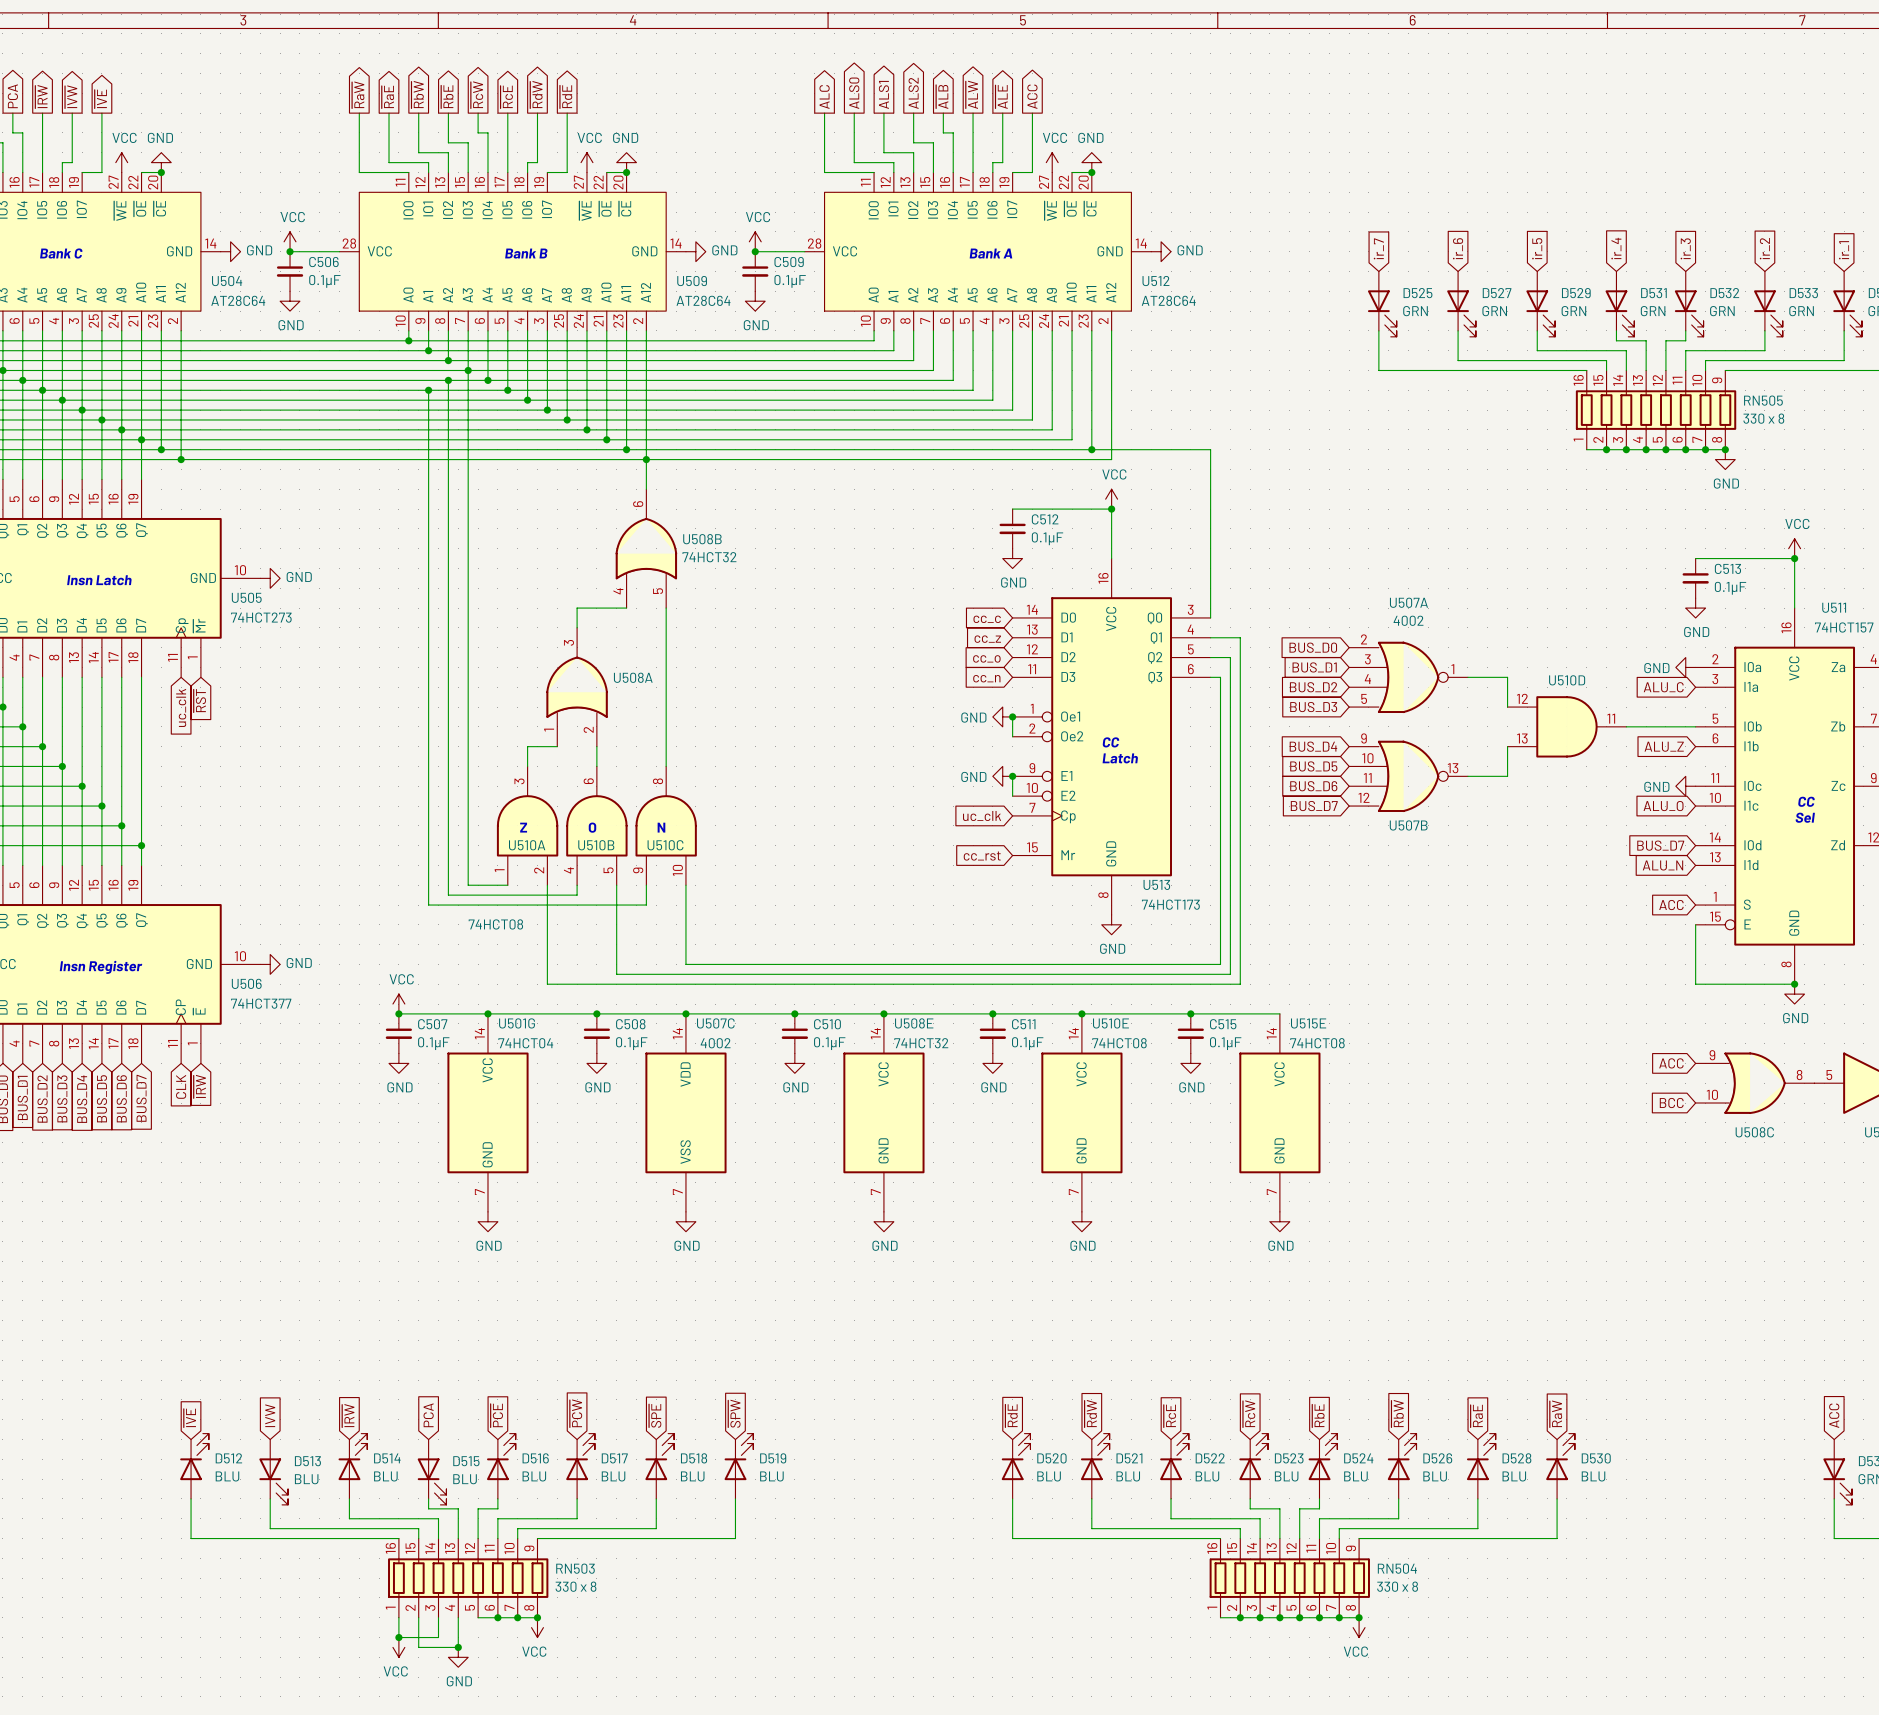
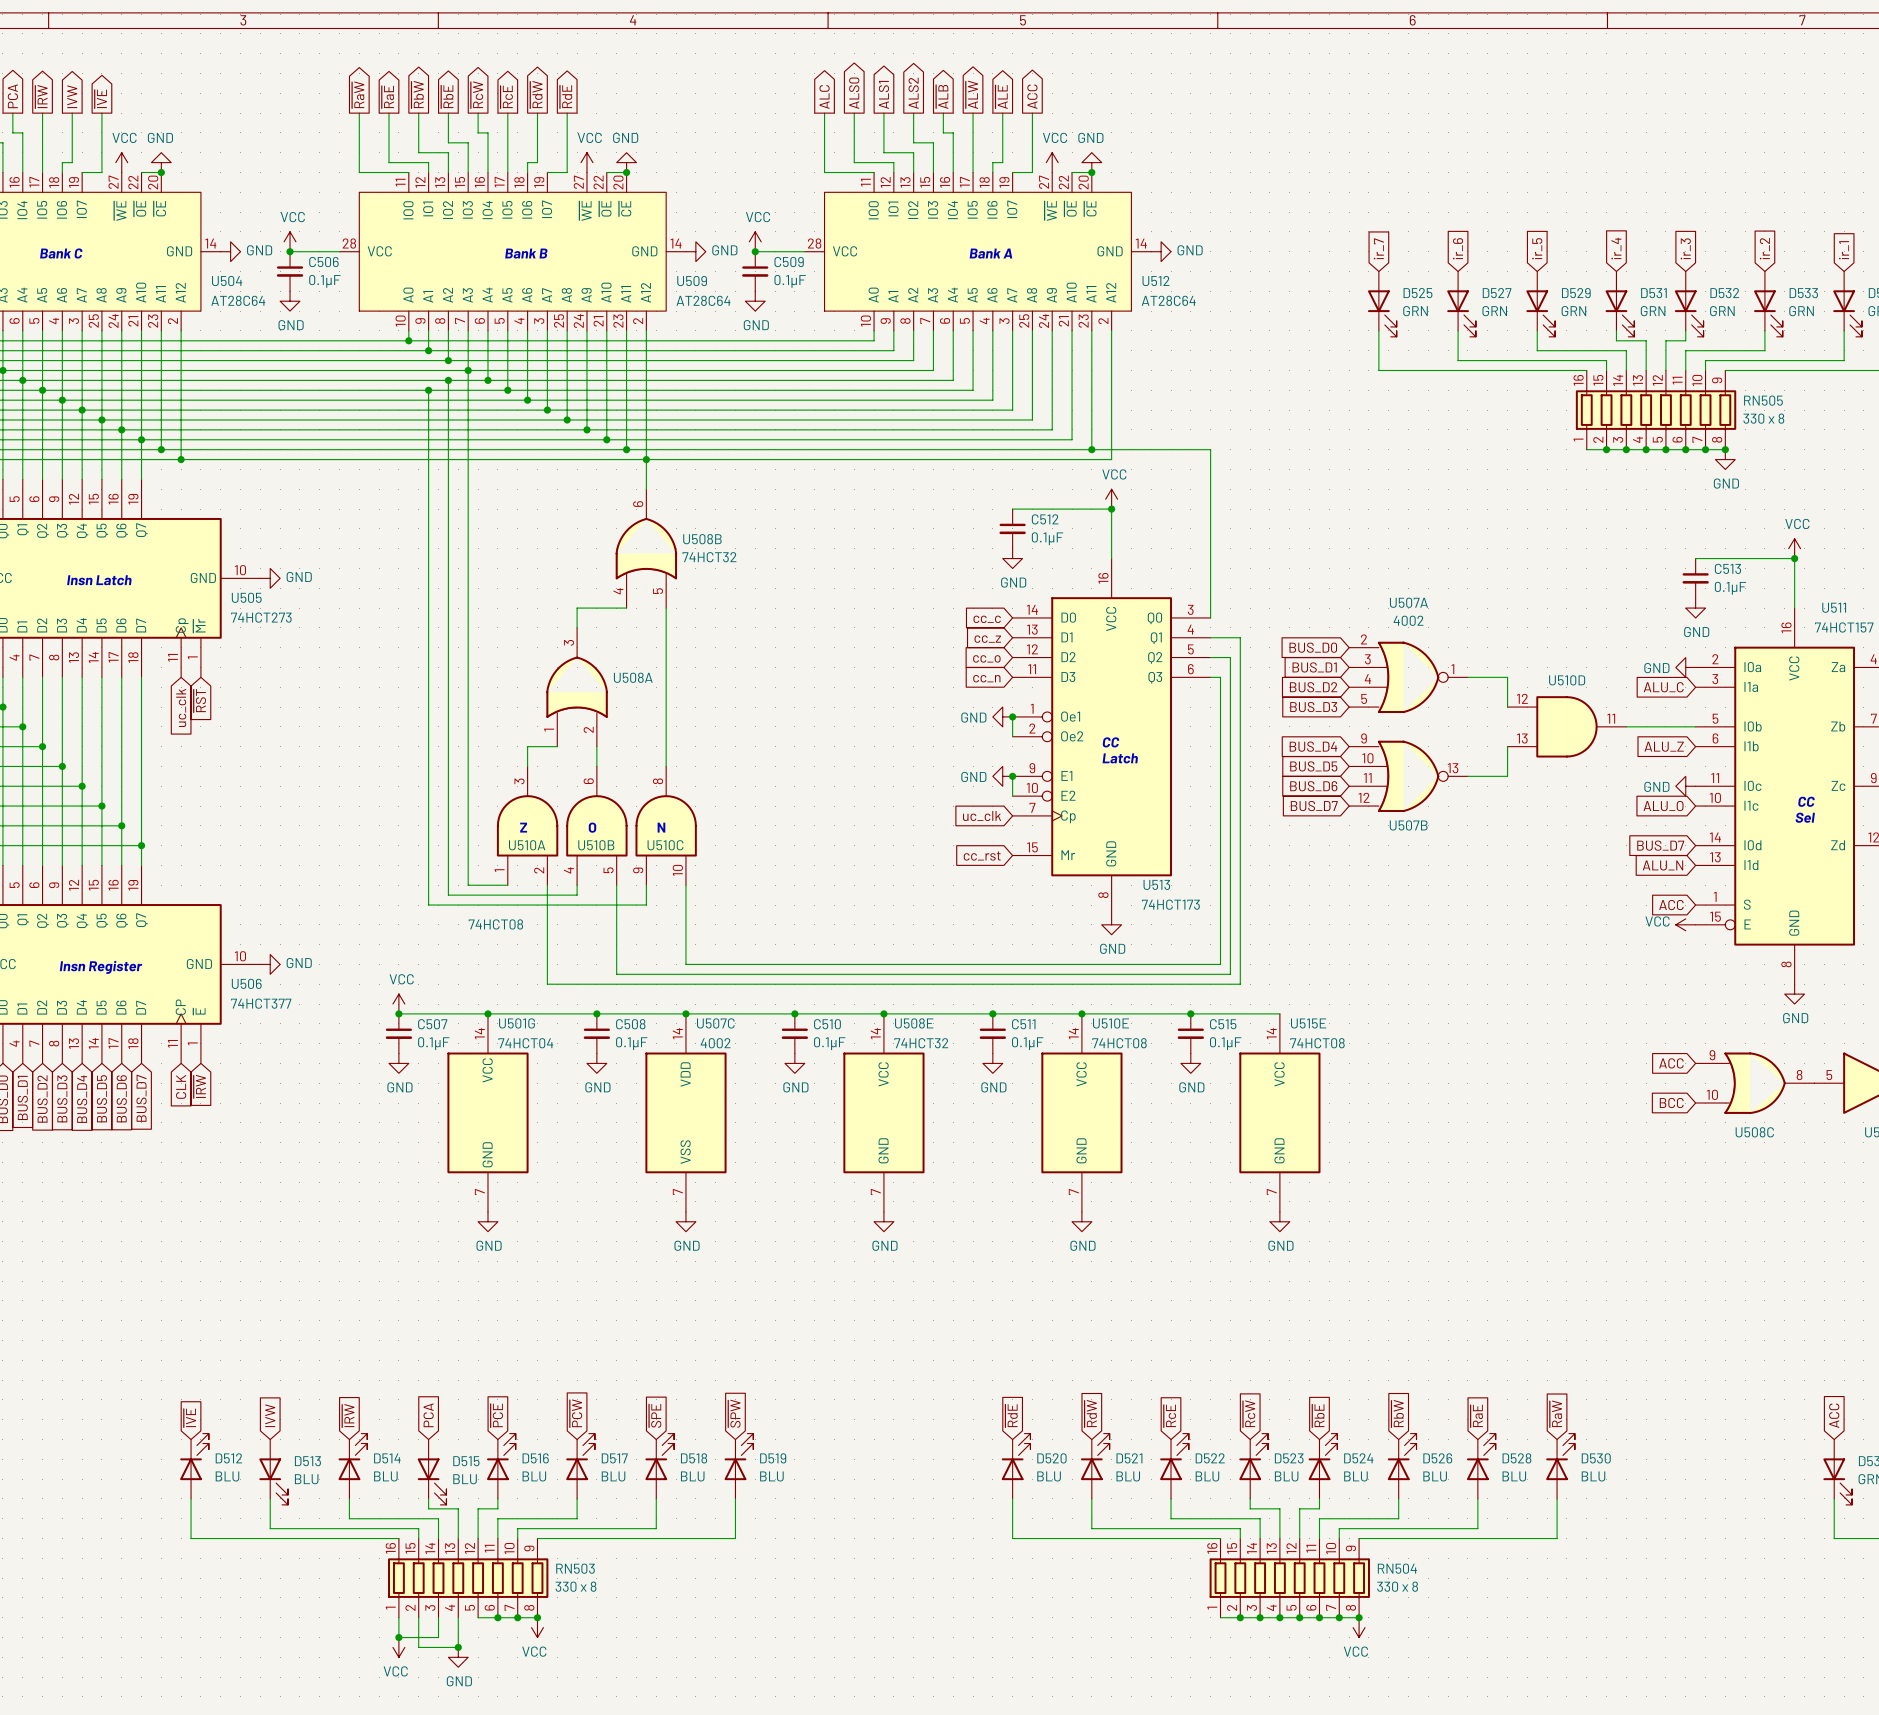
global label: ~{IVW} (71, 96) -> IVW (72, 96)
power symbol: none -> VCC (1685, 924)
wire: (1695, 924) (1695, 984) (1794, 984) -> none
junction: (1794, 984) -> none

